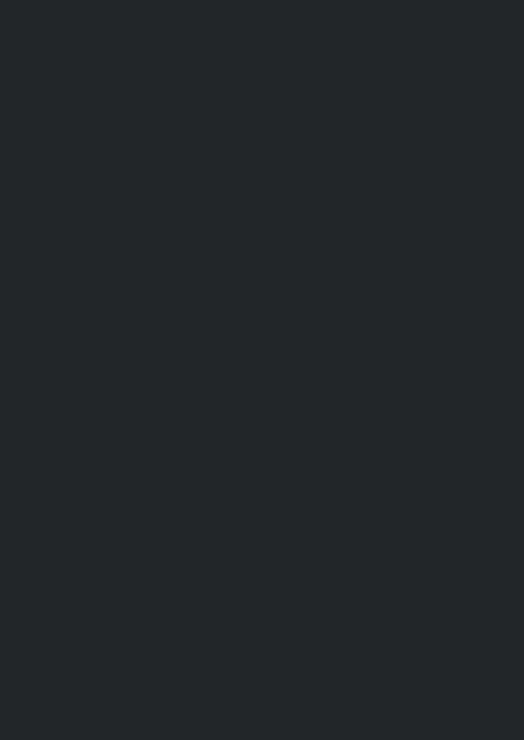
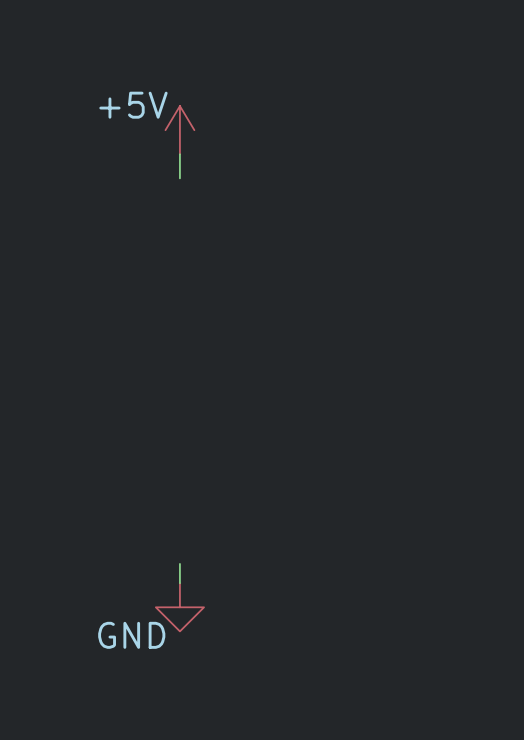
power symbol: none -> +5V (179, 130)
wire: none -> (179, 154) (179, 178)
wire: none -> (179, 563) (179, 583)
power symbol: none -> GND (179, 607)

